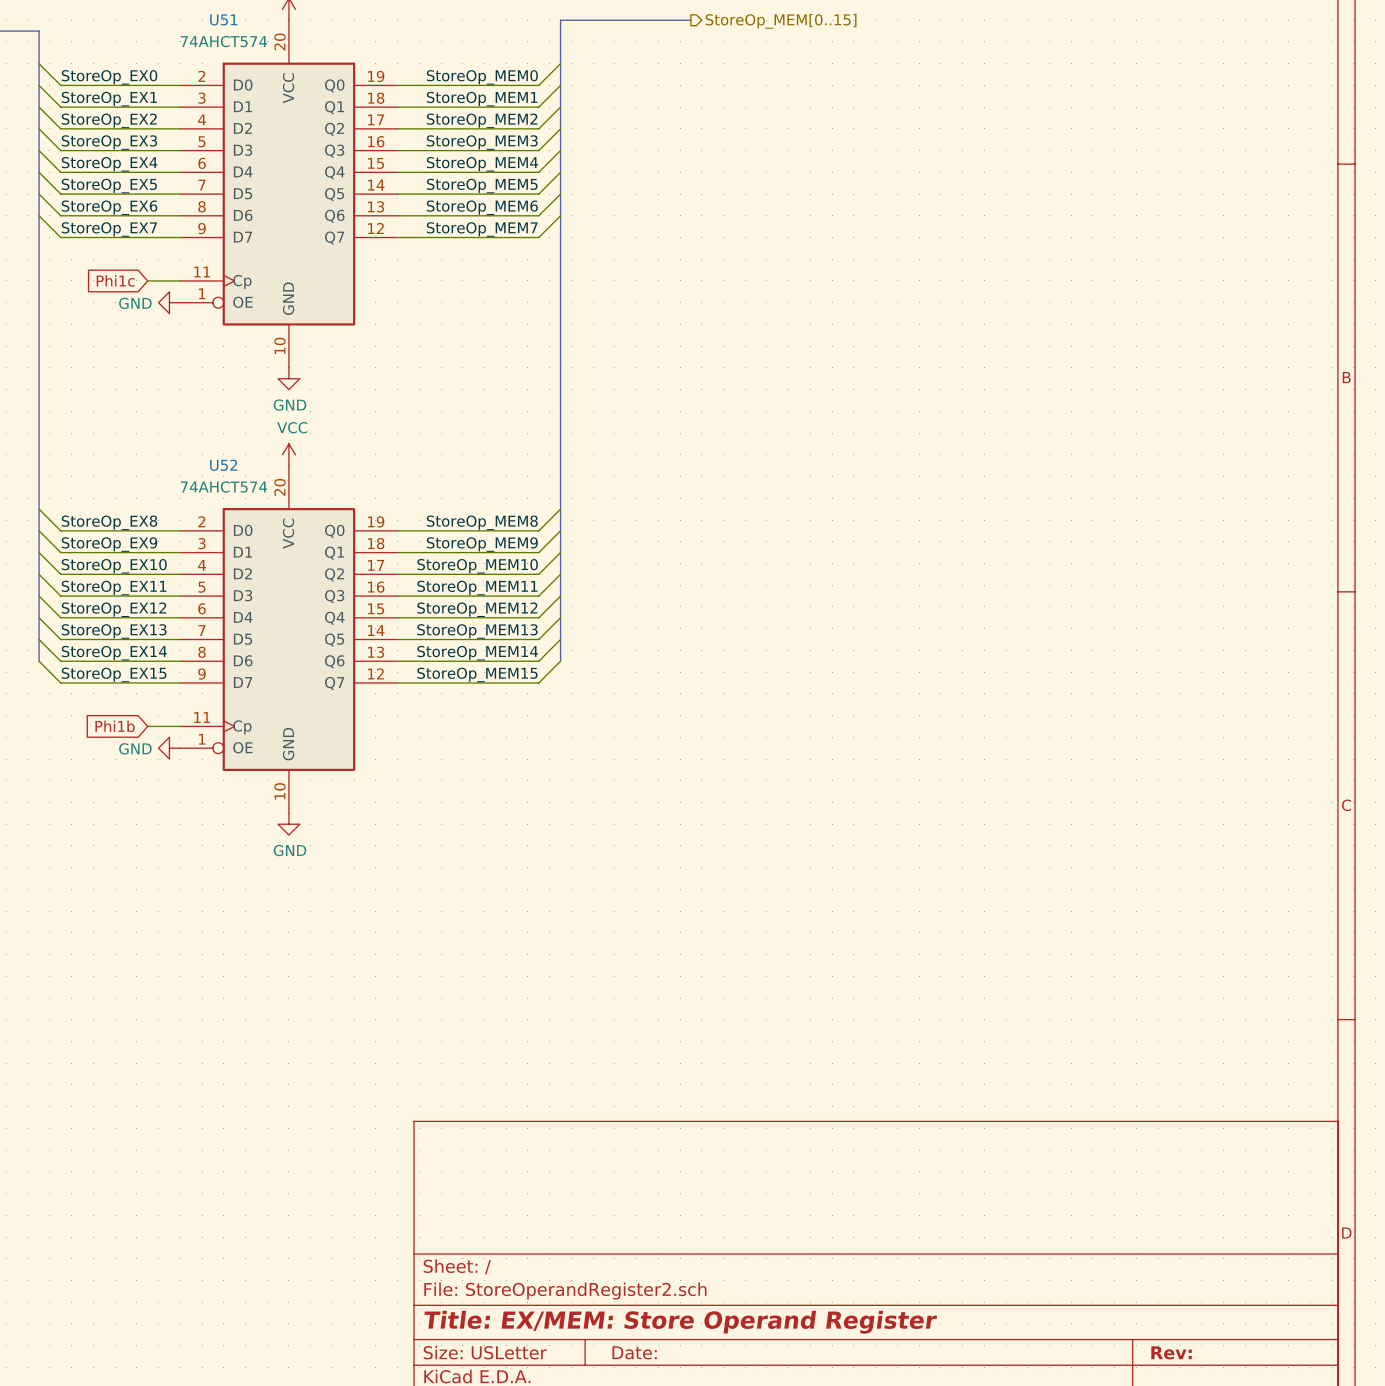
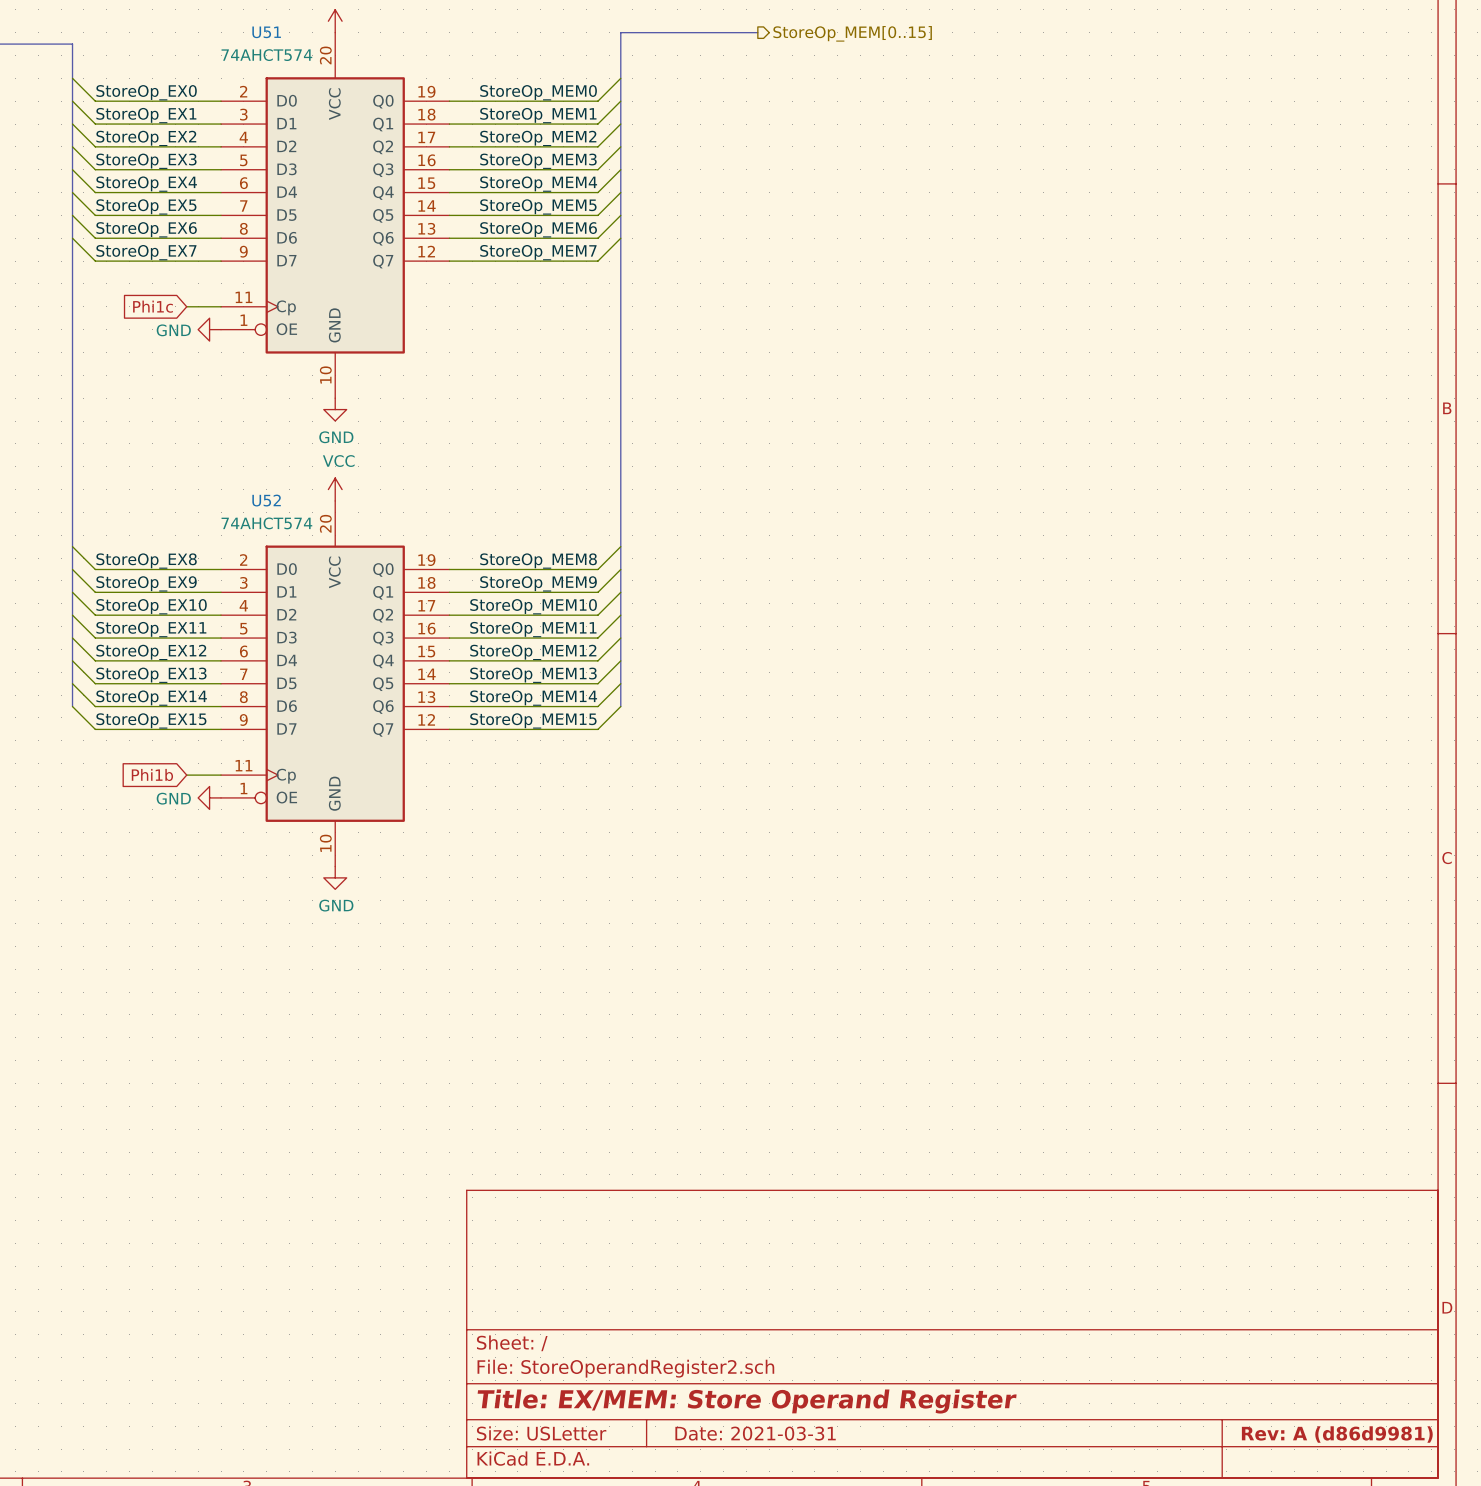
title block: Date: (634, 1352) -> Date: 2021-03-31 (755, 1433)
title block: Rev: (1171, 1352) -> Rev: A (d86d9981) (1337, 1434)

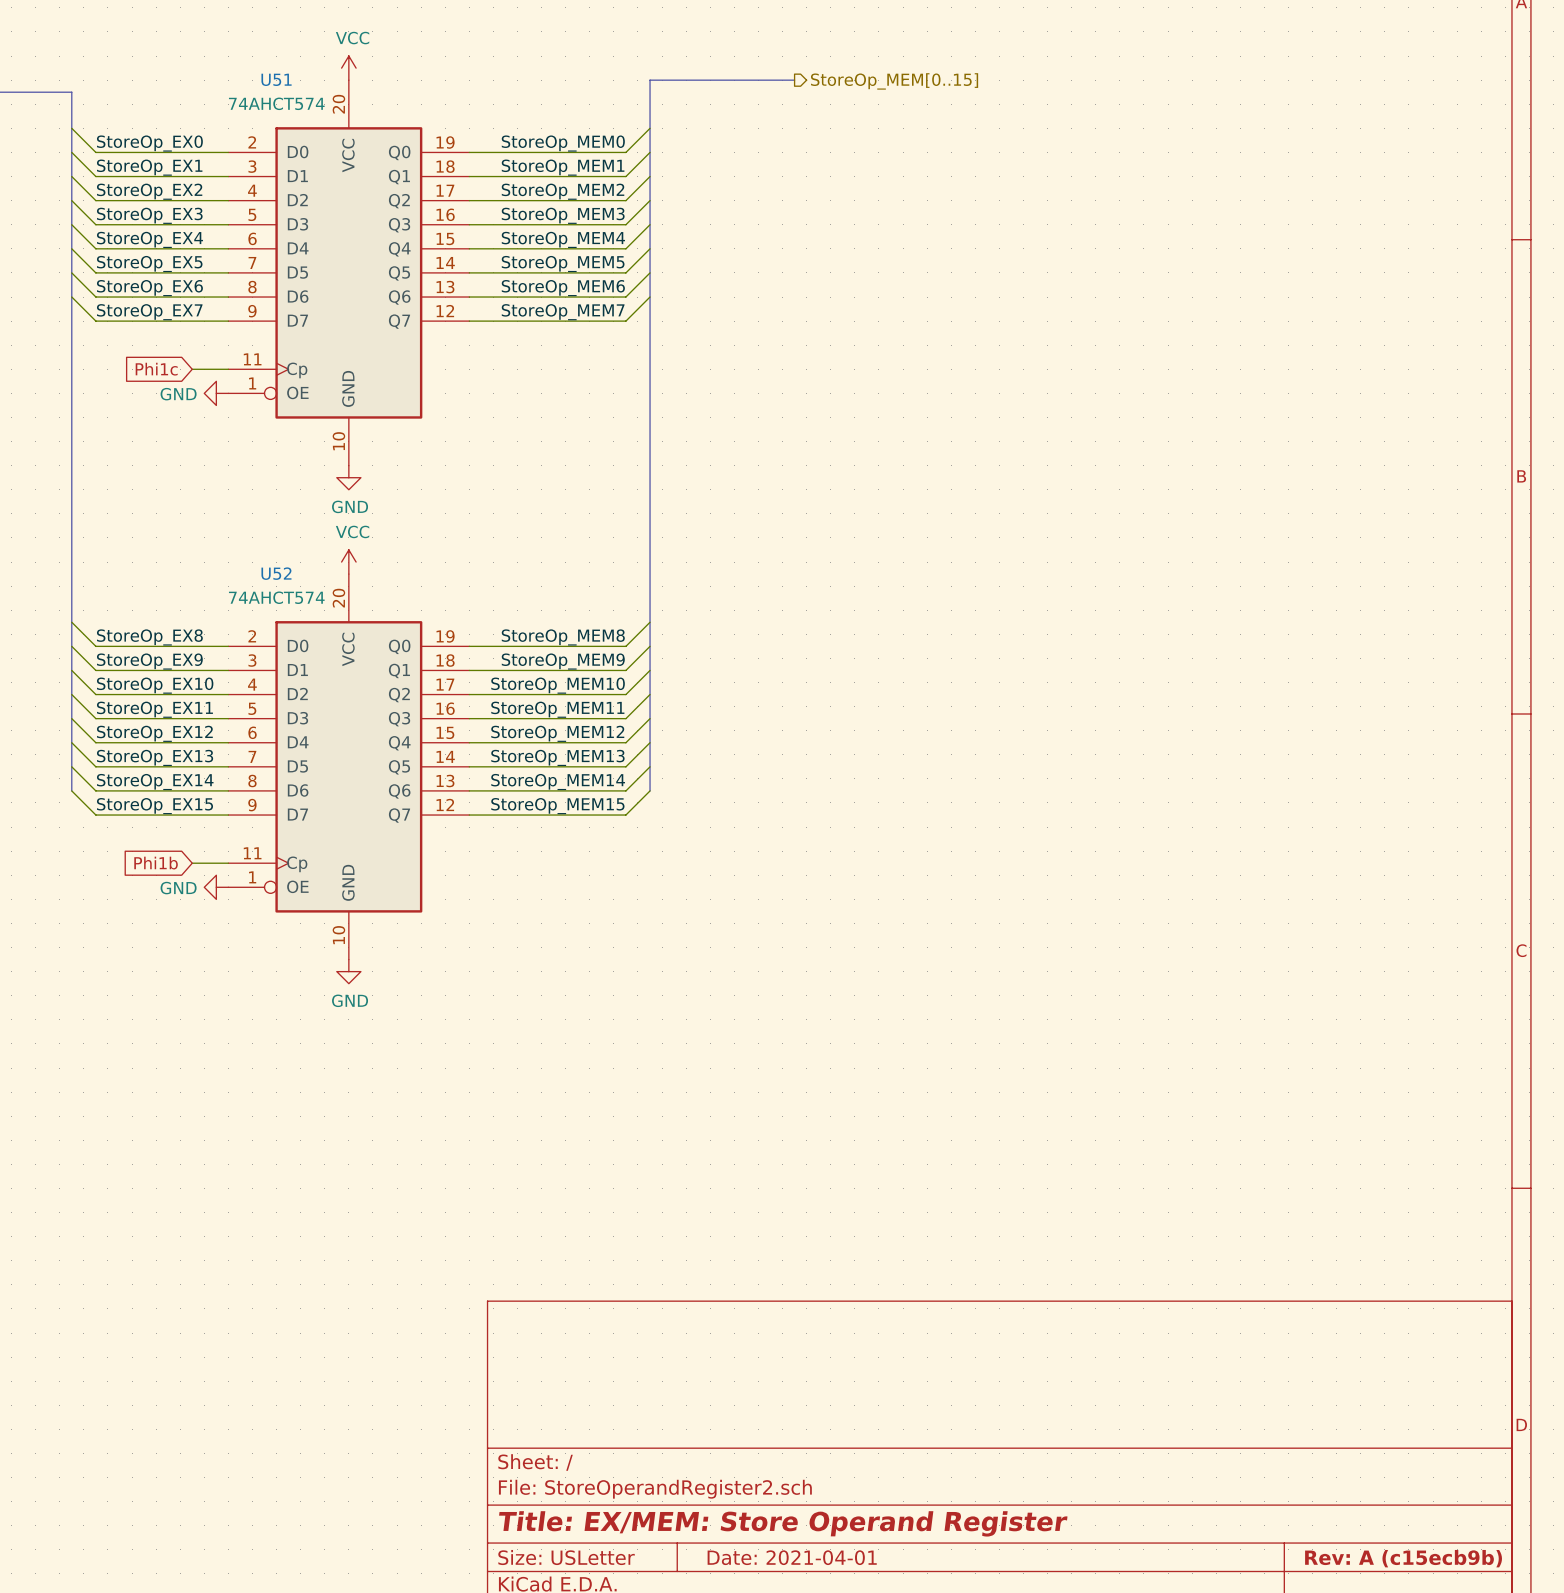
title block: Date: 2021-03-31 (755, 1433) -> Date: 2021-04-01 (792, 1557)
title block: Rev: A (d86d9981) (1337, 1434) -> Rev: A (c15ecb9b) (1403, 1558)

